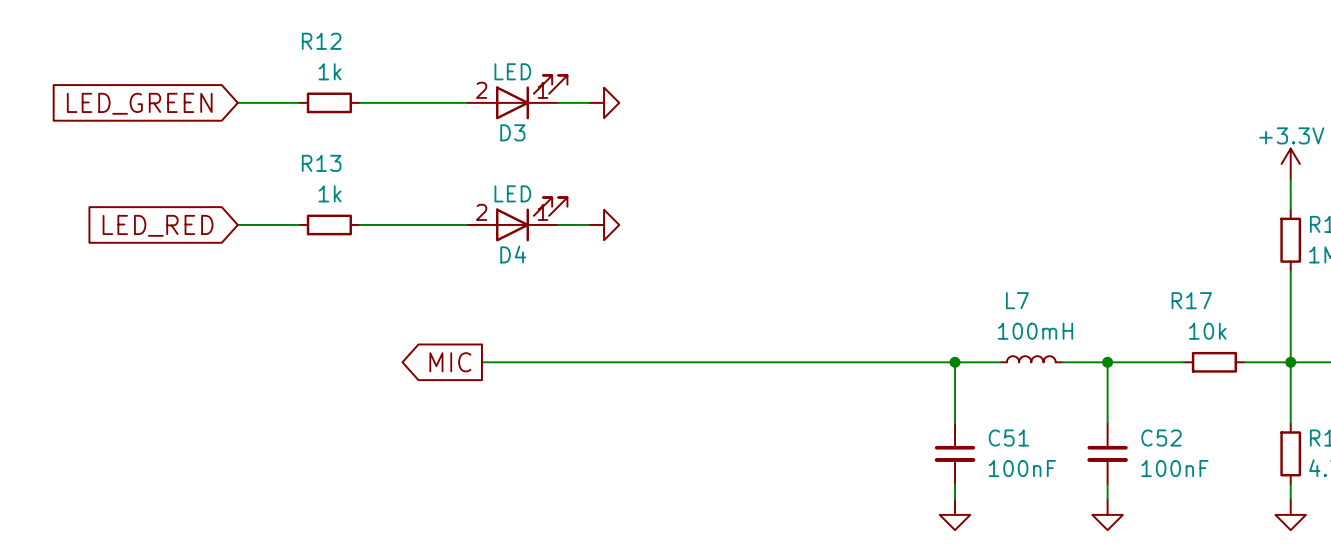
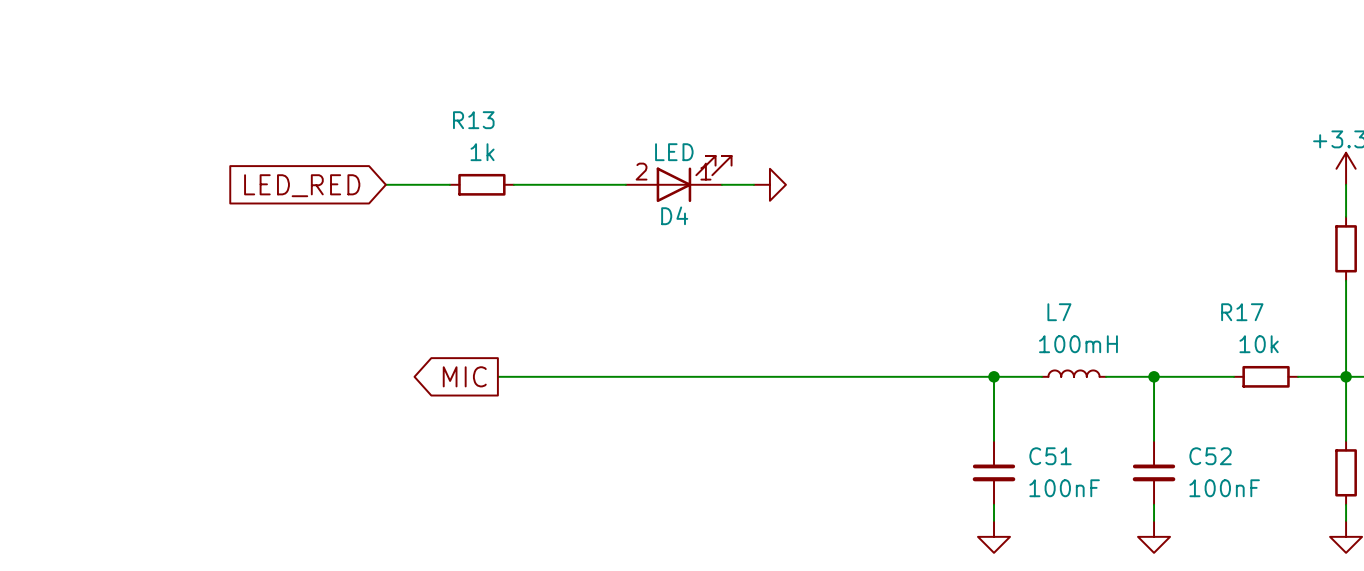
D3: LED (517, 97) -> none
wire: (237, 102) (298, 102) -> none
R12: 1k (329, 102) -> none
wire: (359, 102) (466, 102) -> none
wire: (558, 102) (588, 102) -> none
power symbol: (604, 102) -> none
global label: LED_GREEN (139, 103) -> none
power symbol: none -> (769, 184)
D4 position: (517, 219) -> (678, 179)
wire: (237, 224) (298, 224) -> (385, 184) (449, 184)
R13 position: (329, 224) -> (481, 184)
wire: (359, 224) (466, 224) -> (513, 184) (625, 184)
wire: (558, 224) (588, 224) -> (721, 184) (753, 184)
power symbol: (604, 224) -> none
global label position: LED_RED (158, 225) -> LED_RED (302, 185)

